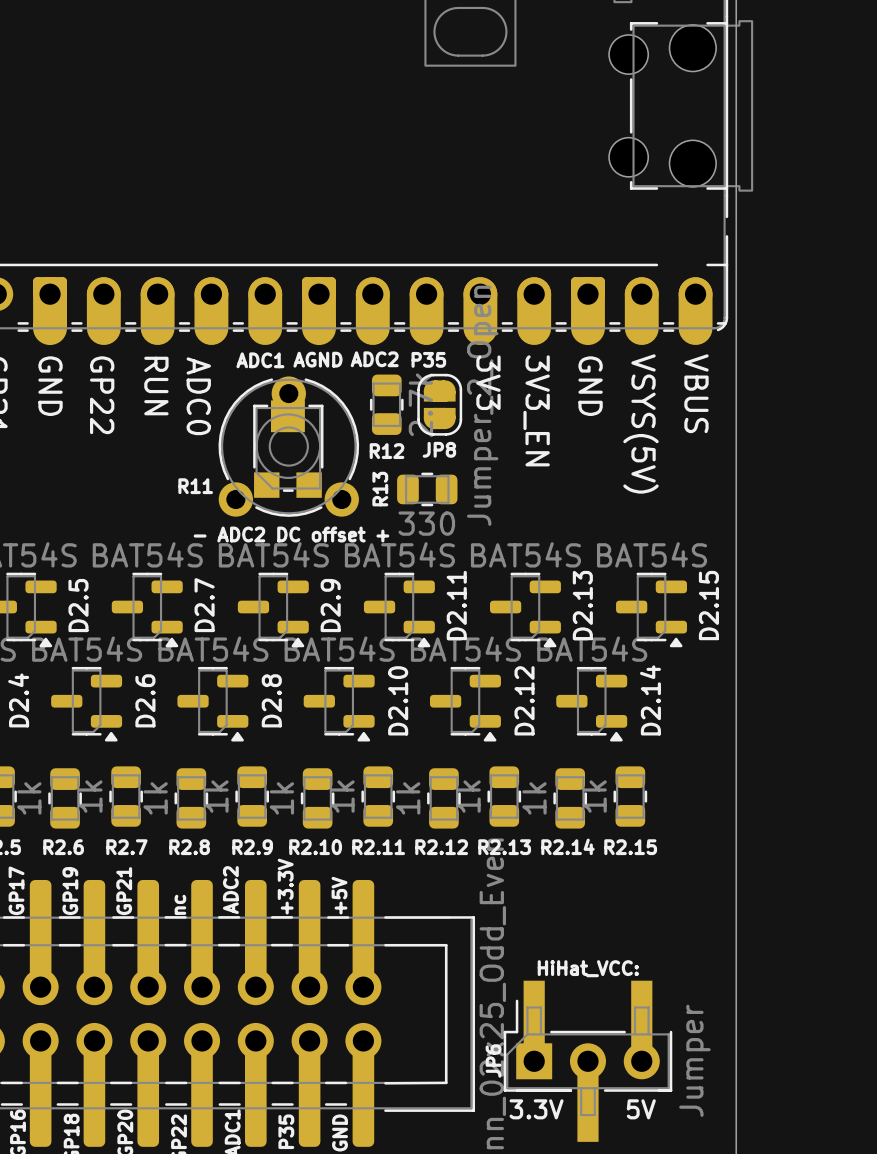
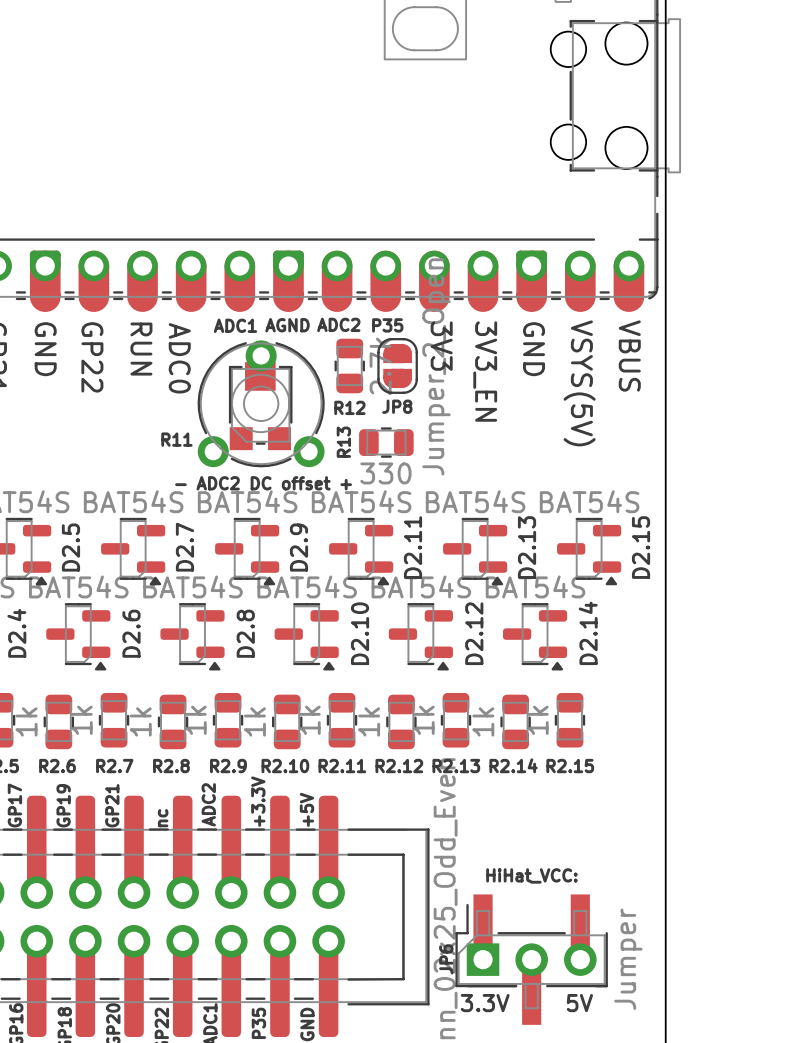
JP6 footprint: [503, 980, 673, 1142] -> [455, 894, 608, 1025]

